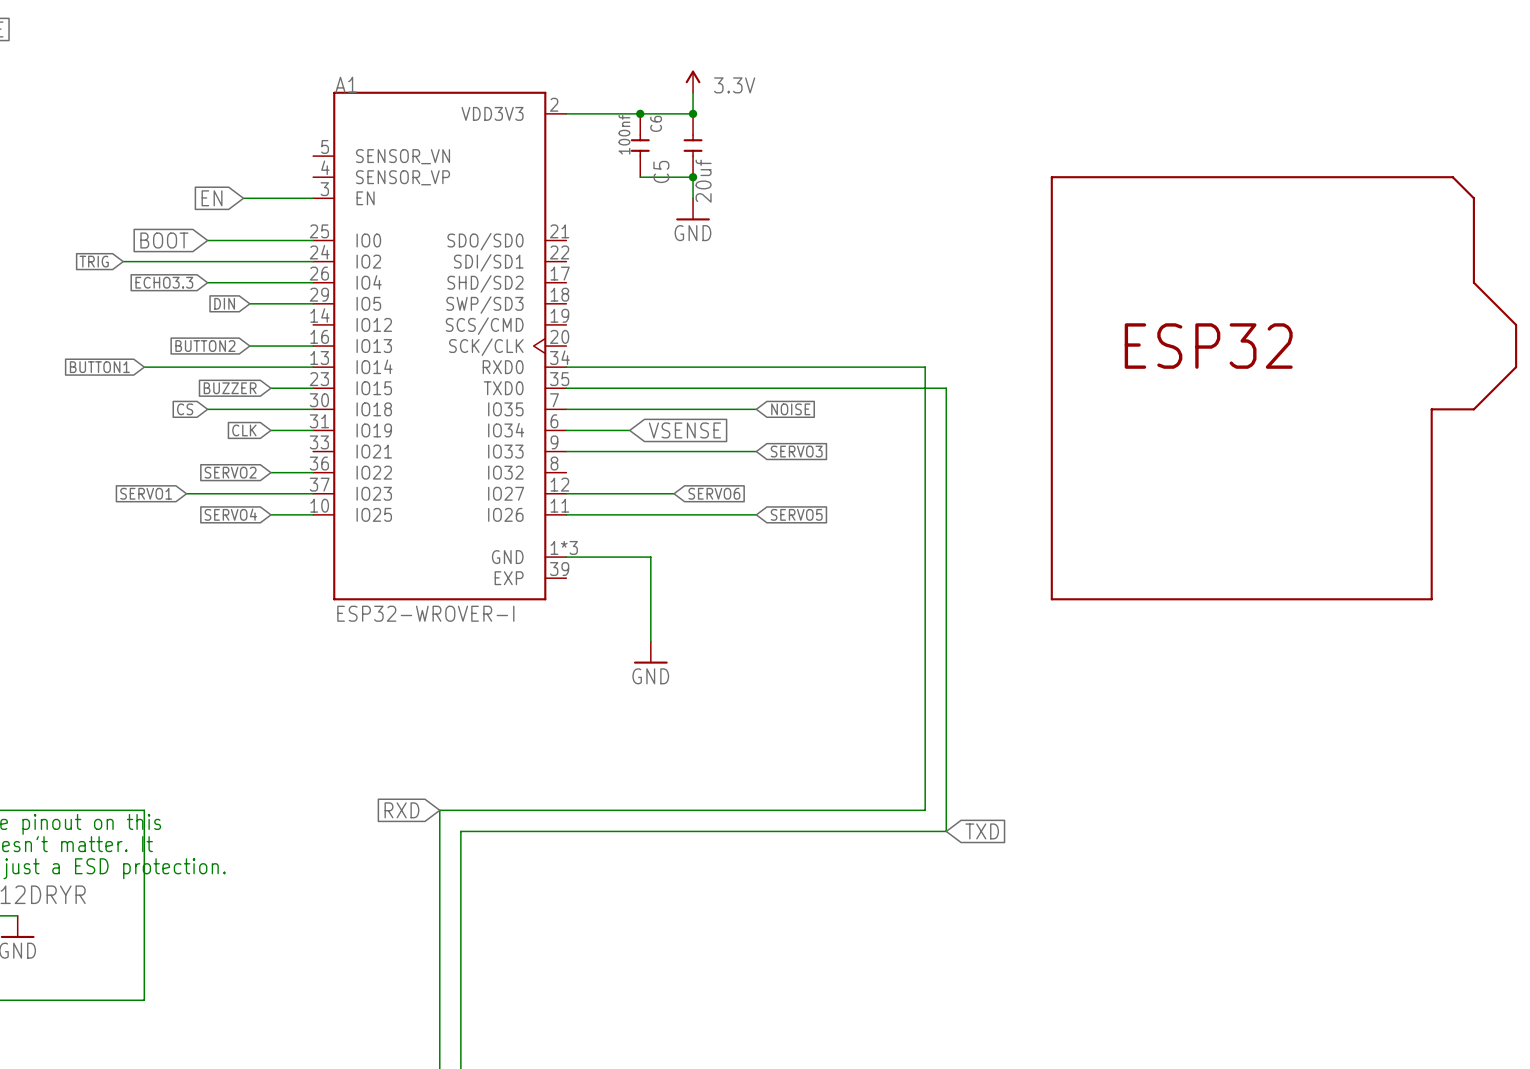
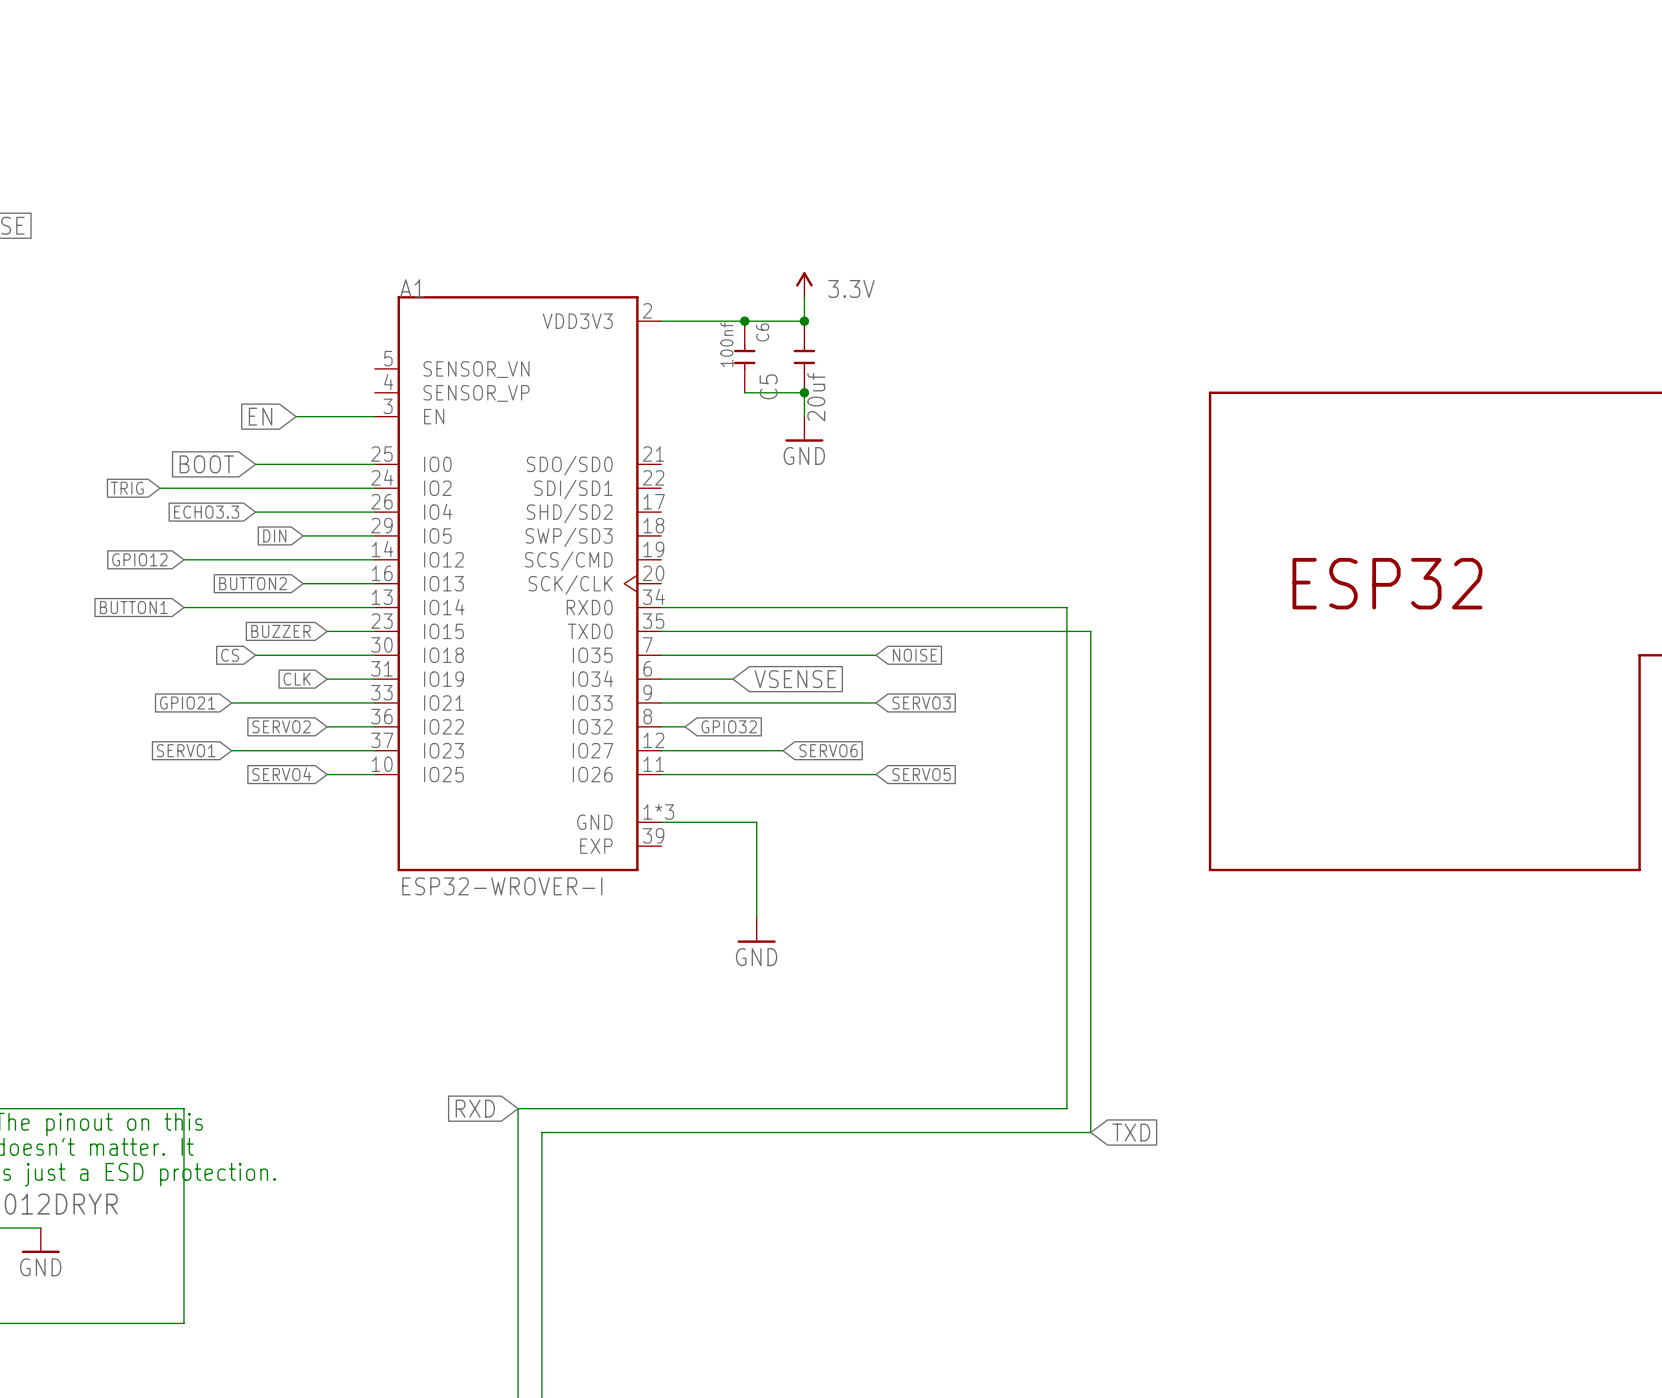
global label: none -> GPIO12 (139, 559)
wire: none -> (183, 559) (374, 559)
global label: none -> GPIO21 (187, 702)
wire: none -> (231, 702) (374, 702)
wire: none -> (661, 726) (685, 726)
global label: none -> GPIO32 (729, 726)

